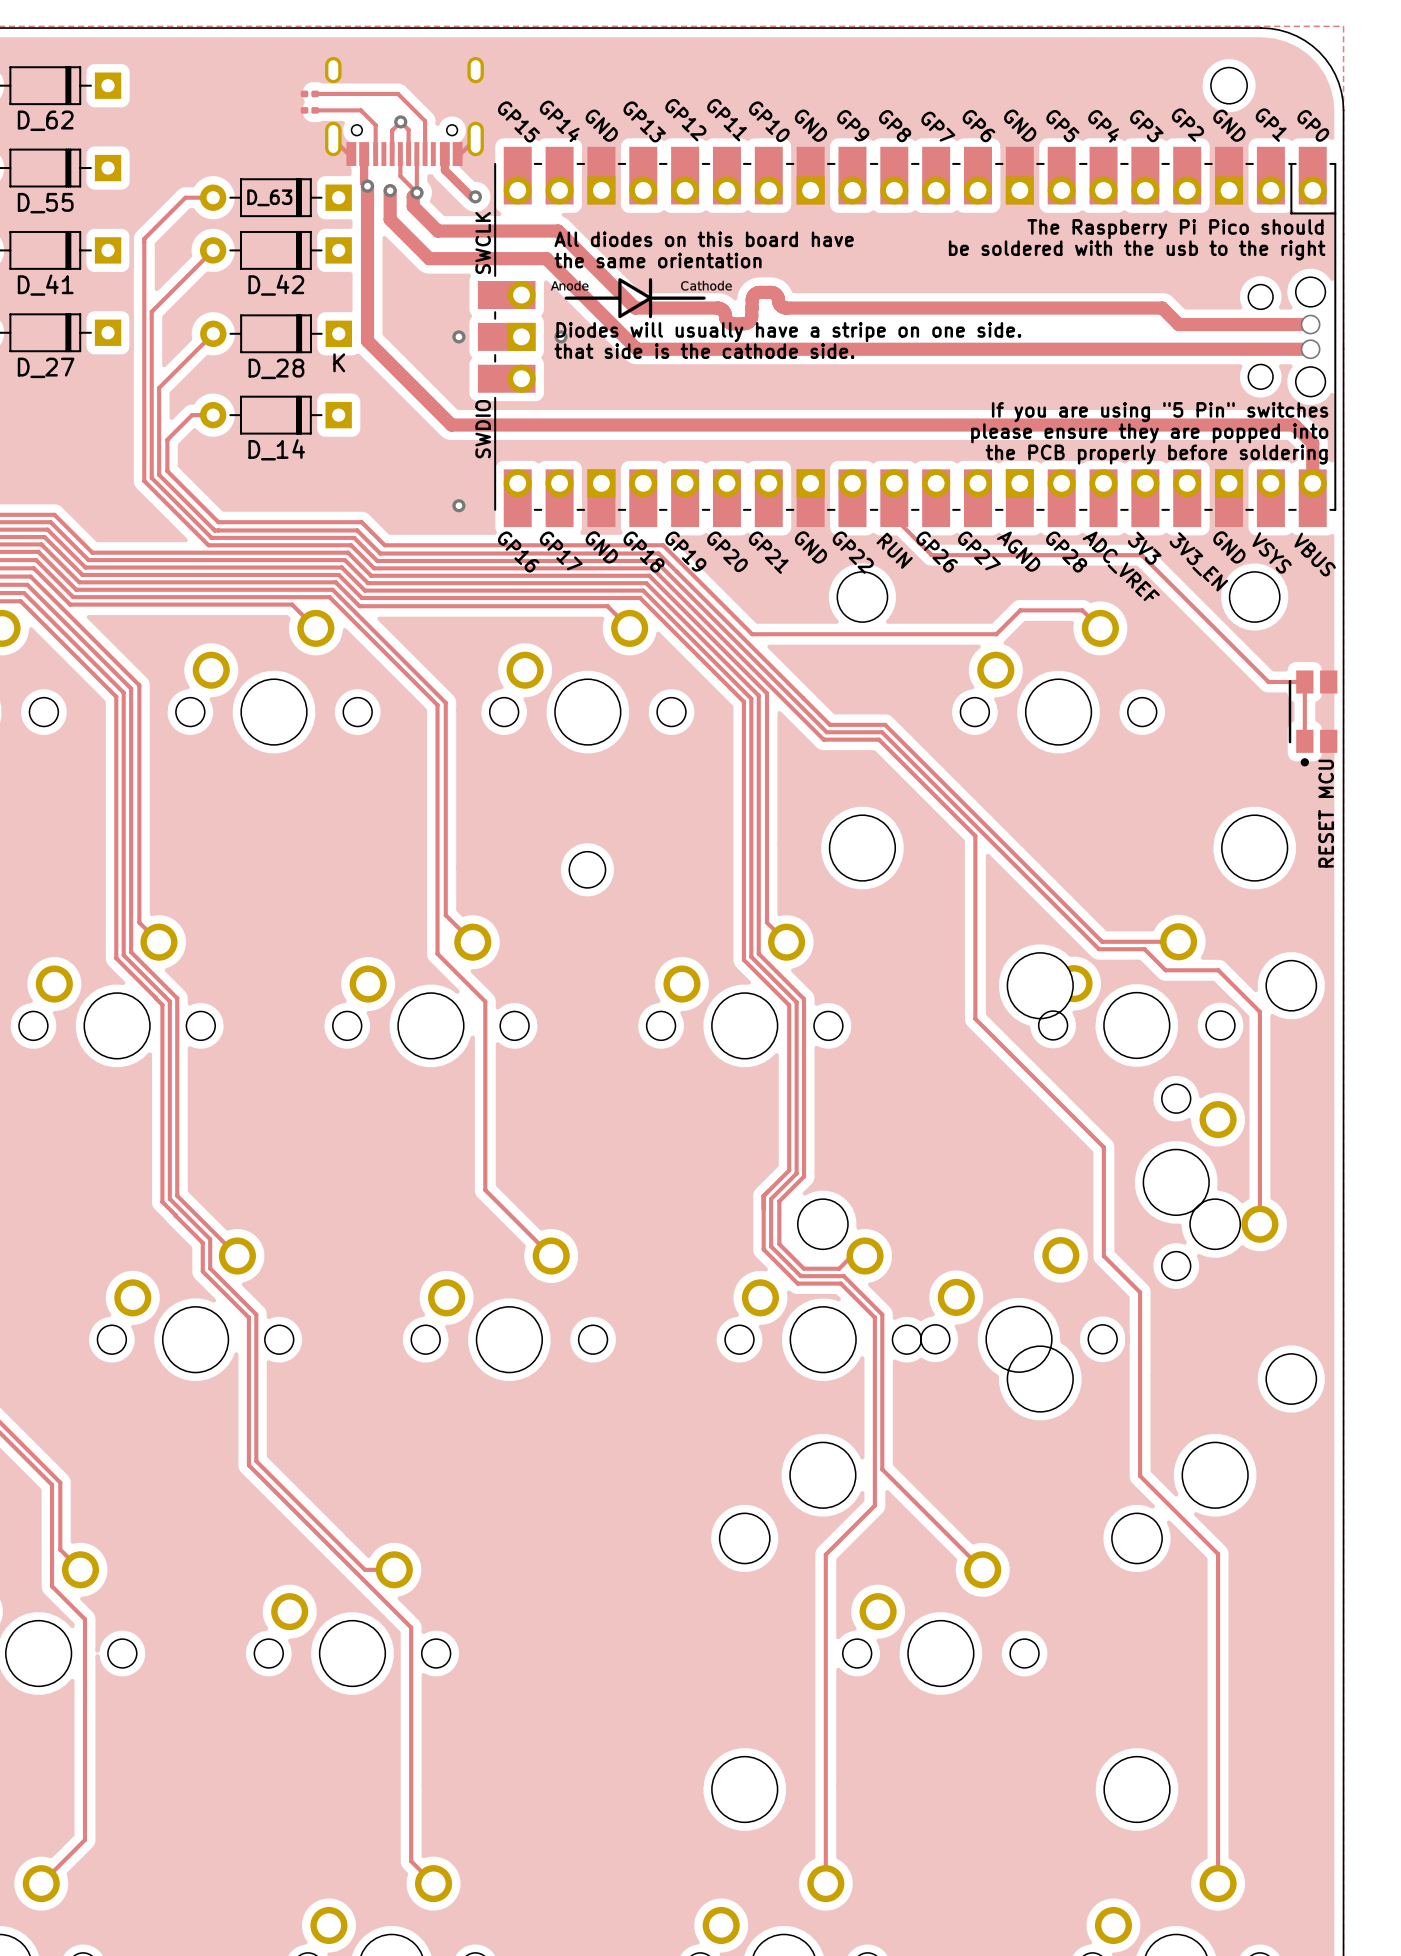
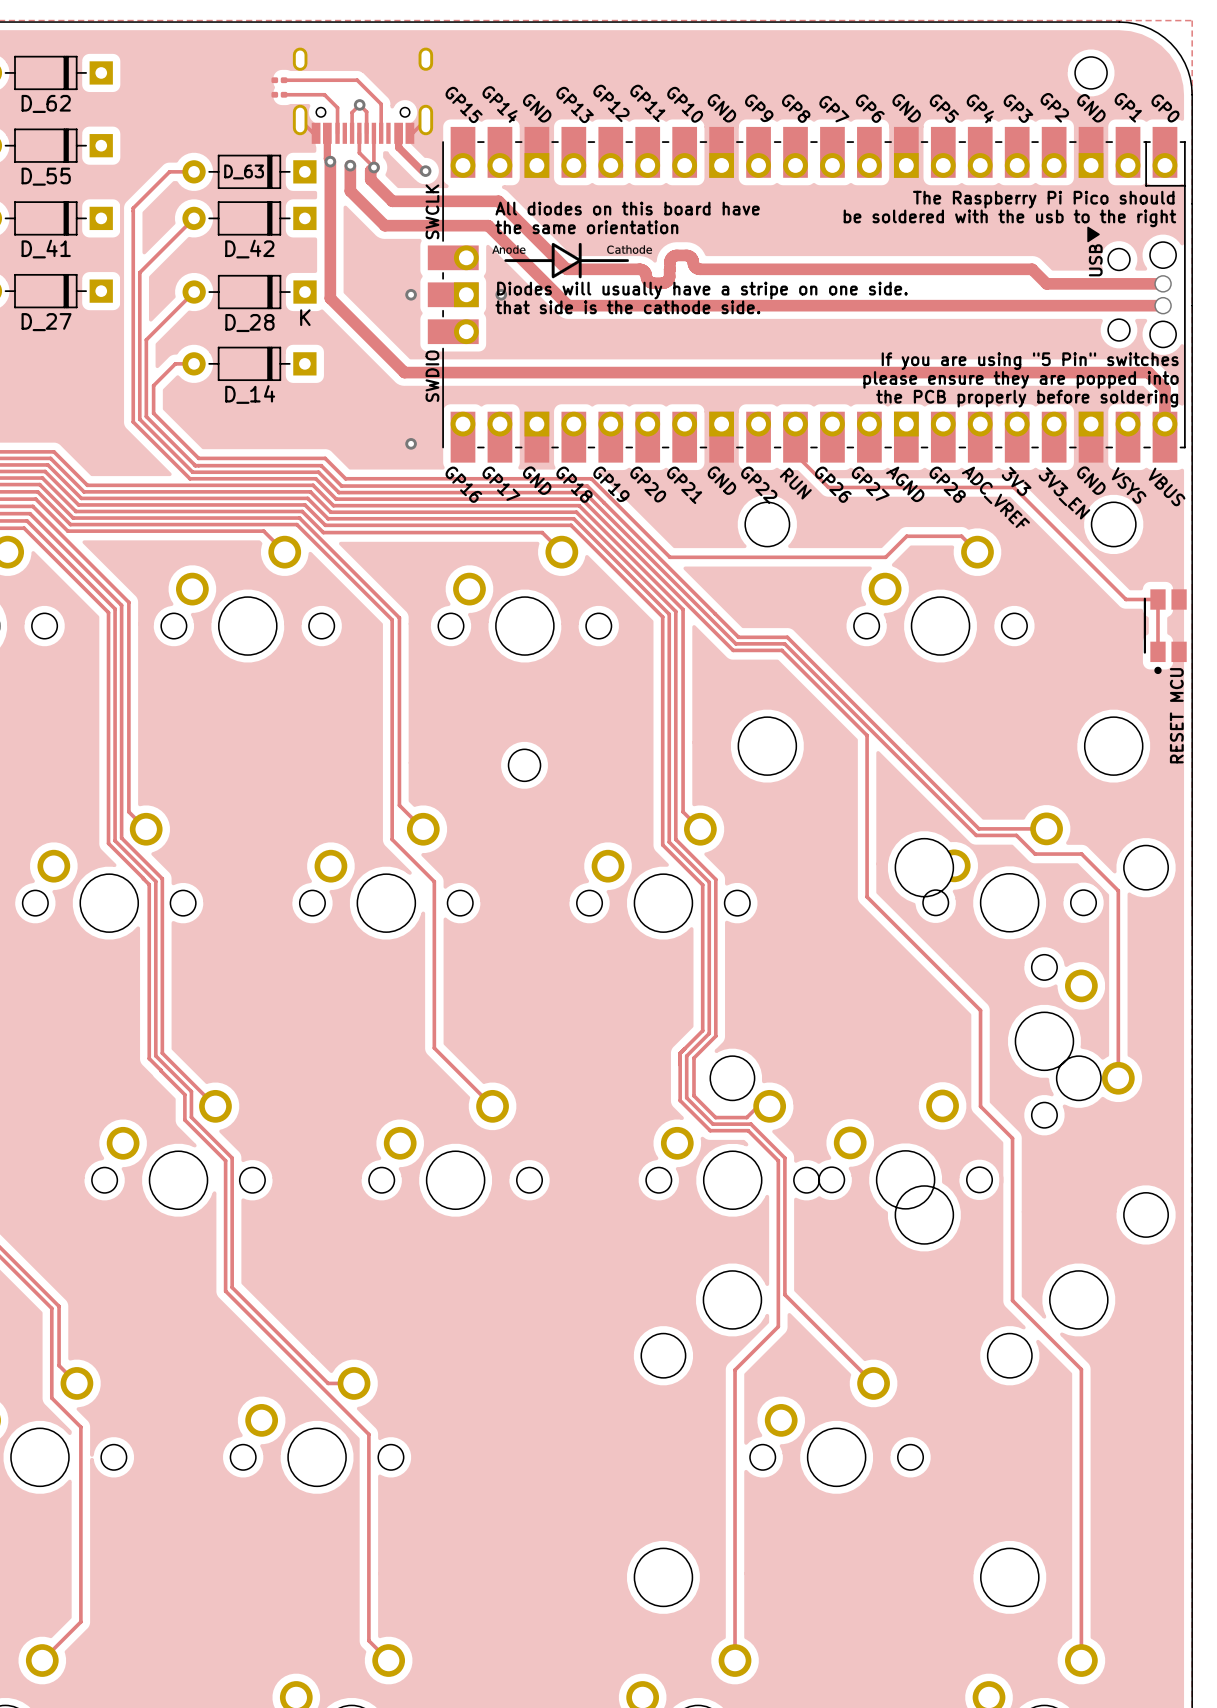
drawing: none -> [1087, 226, 1100, 243]
text: none -> USB (1095, 260)

